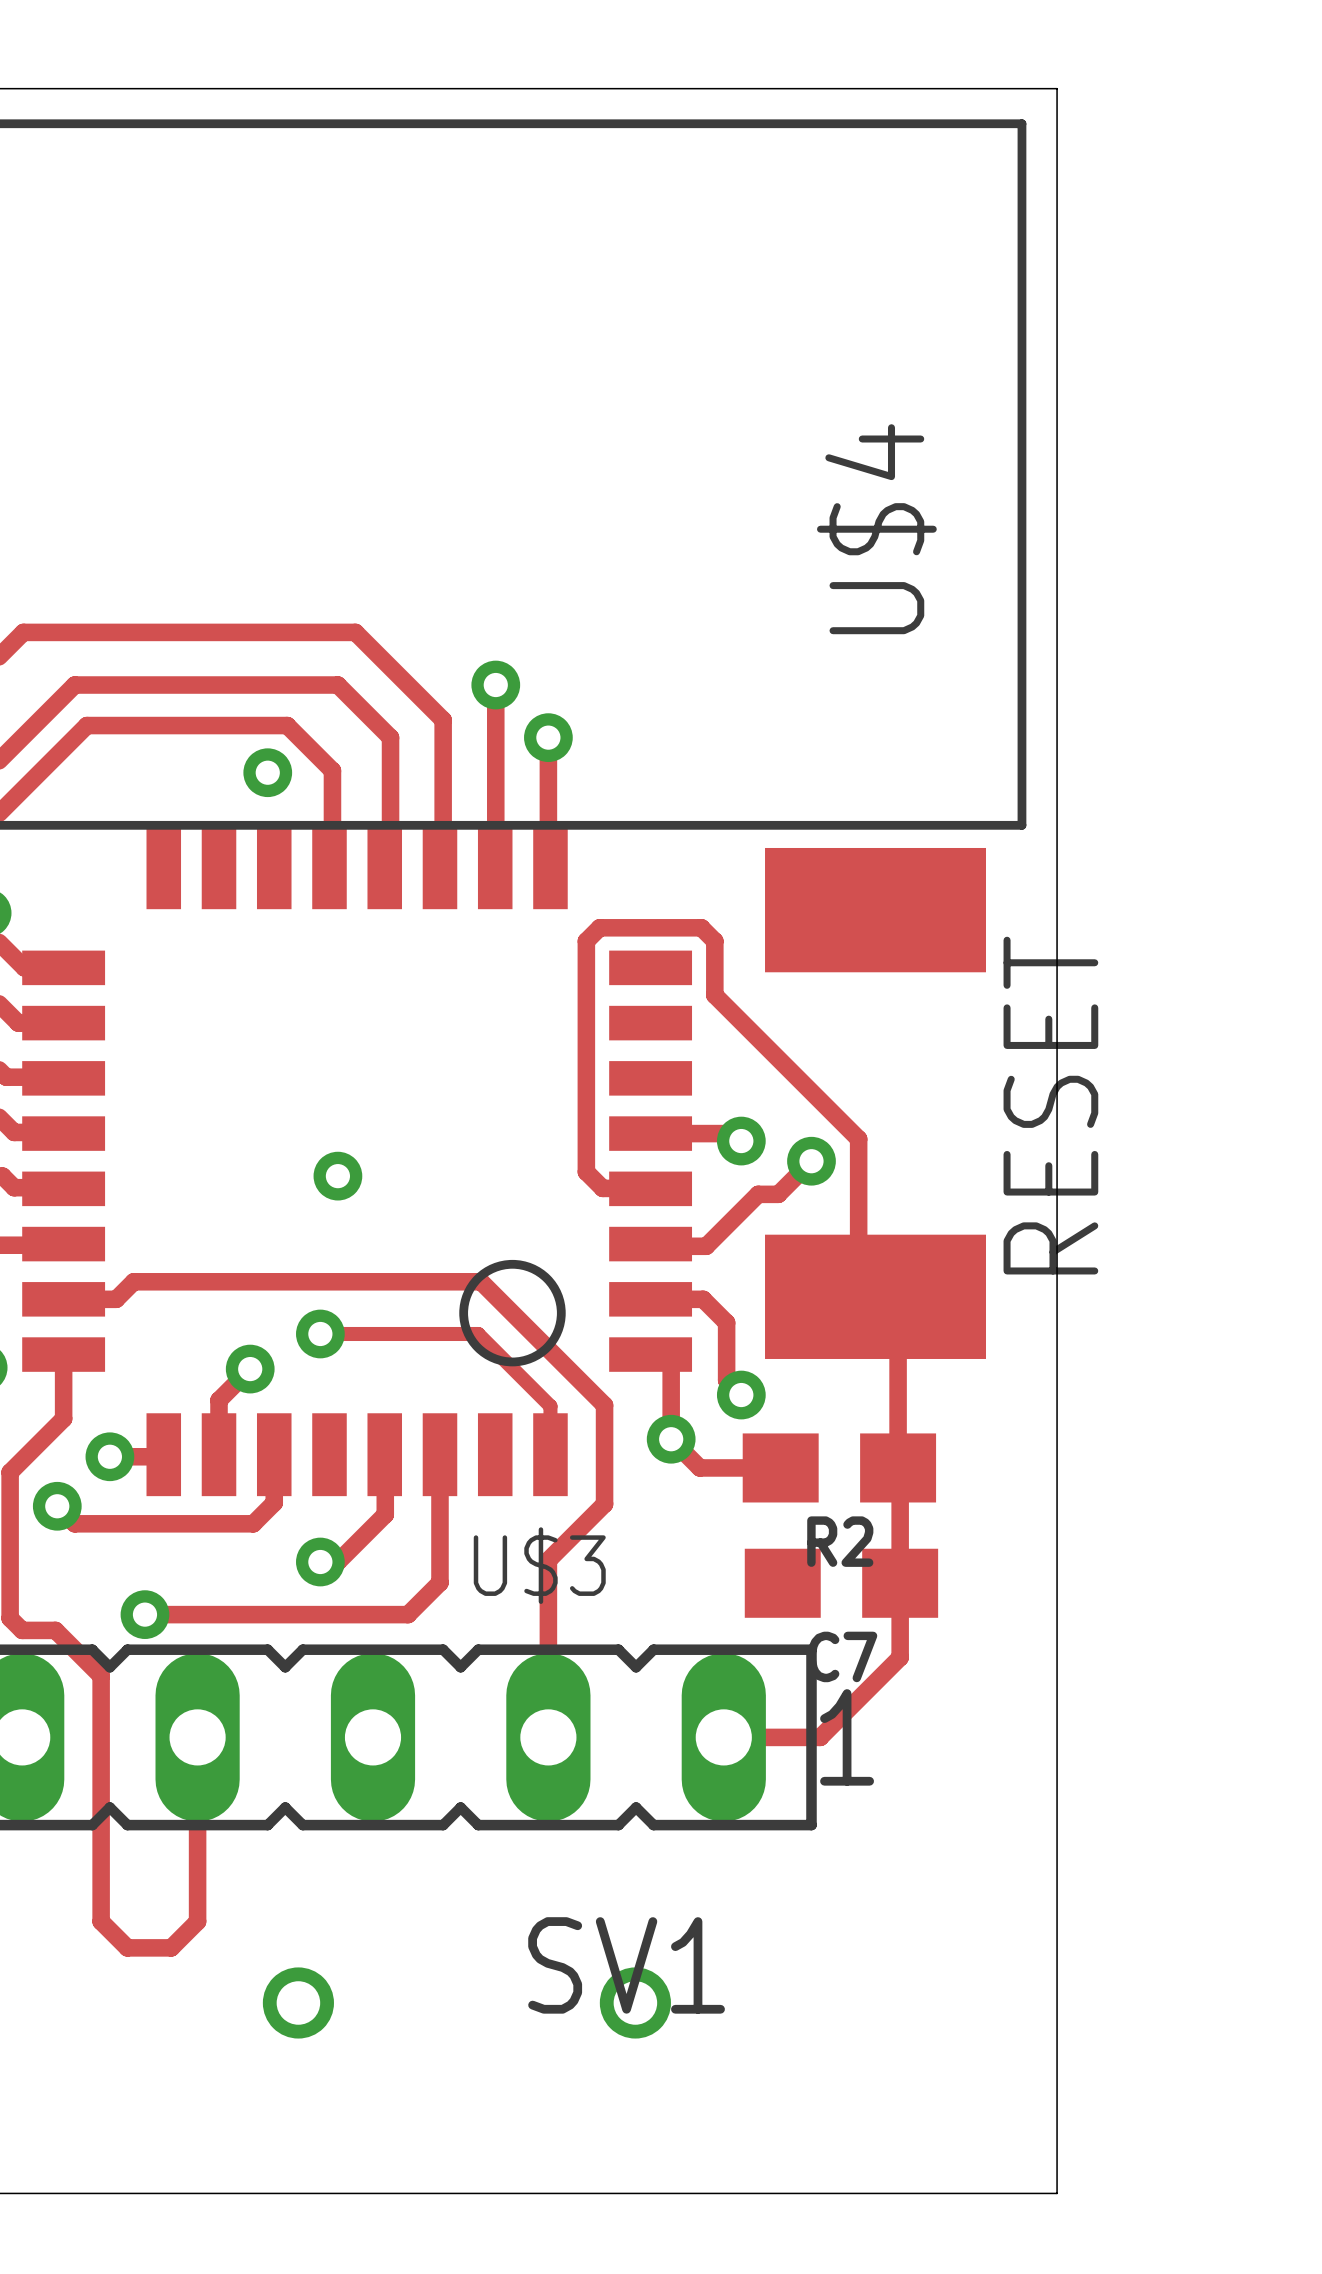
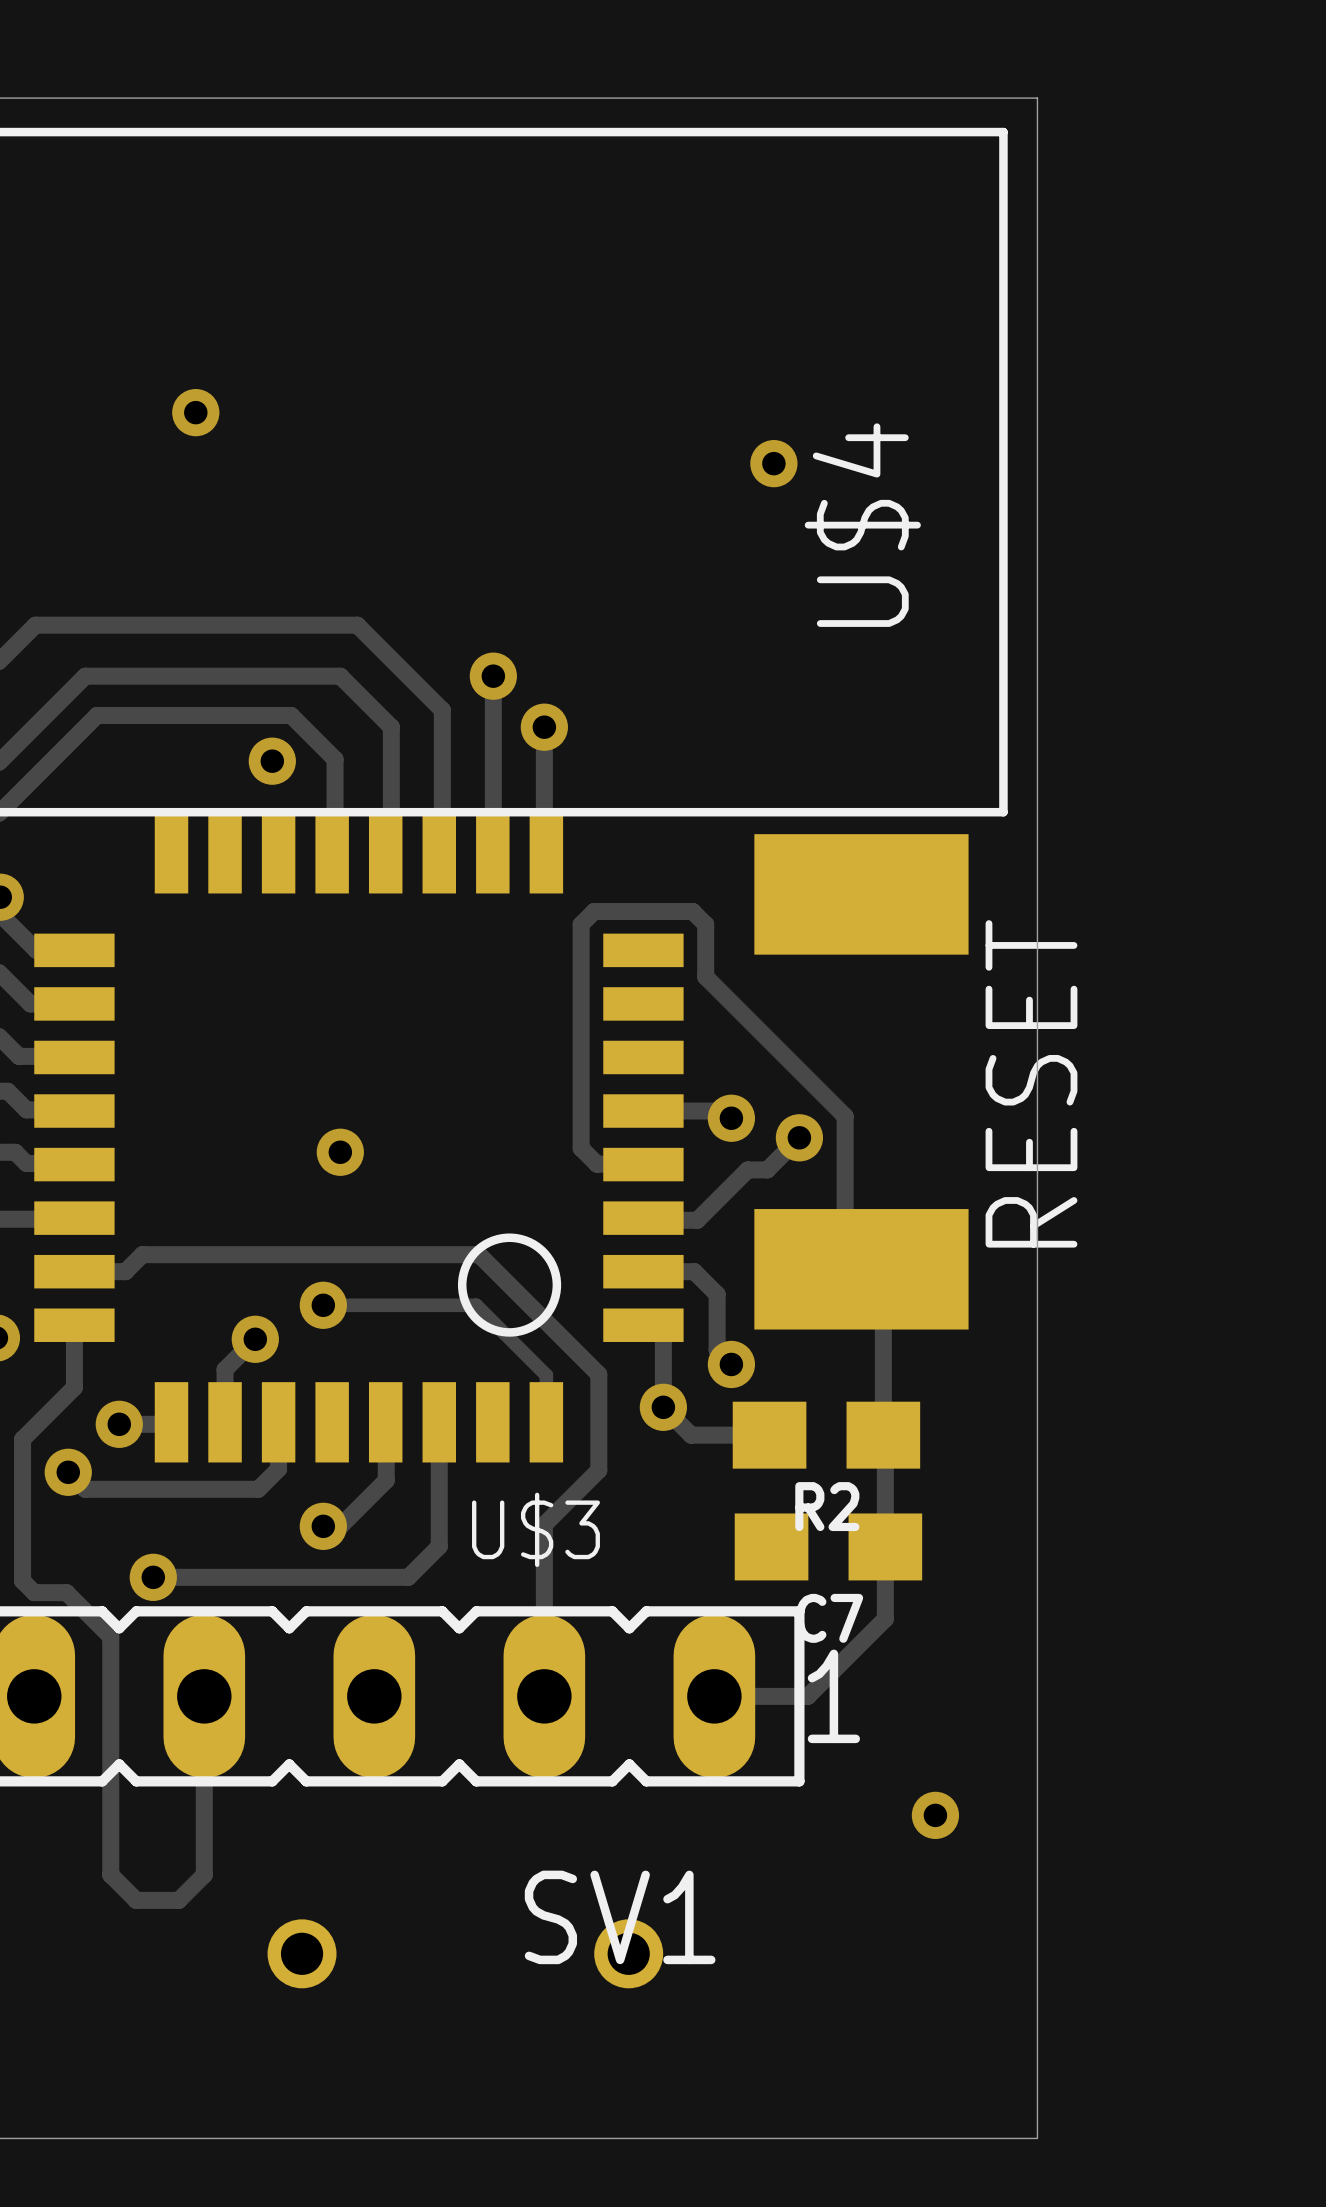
via: none -> (195, 412)
via: none -> (773, 463)
via: none -> (935, 1815)

